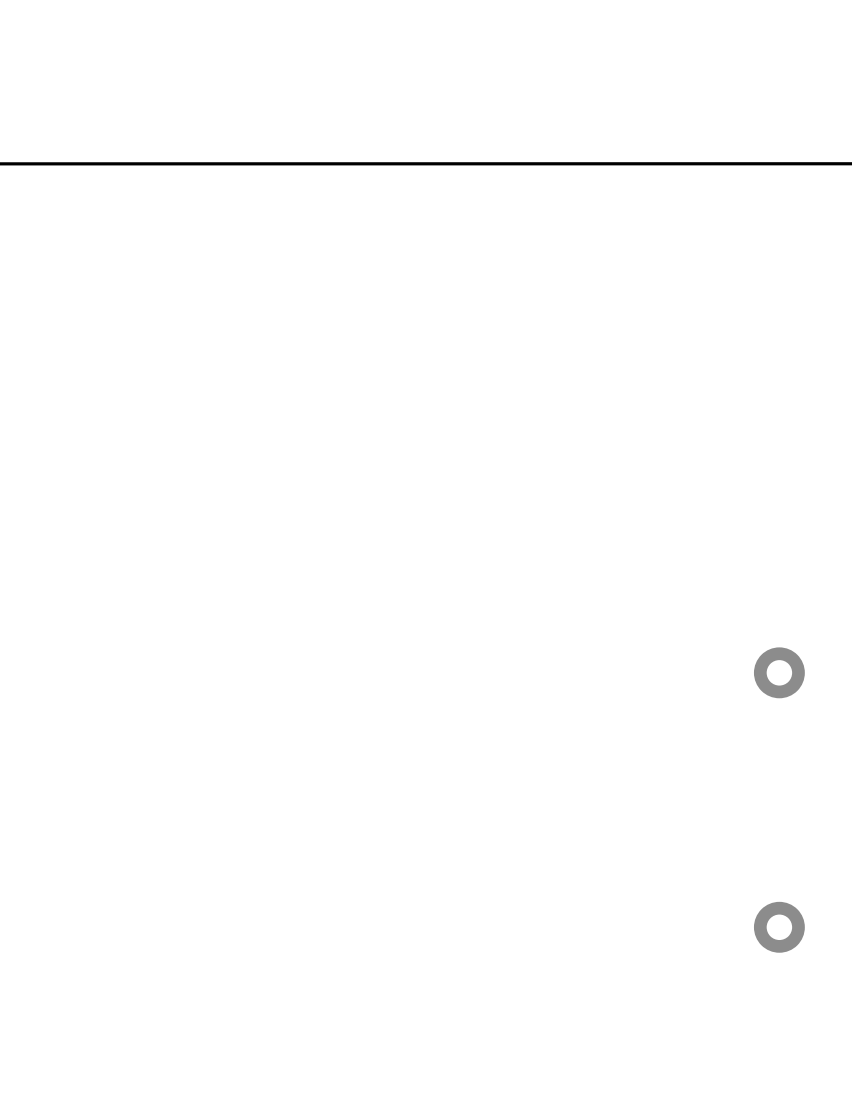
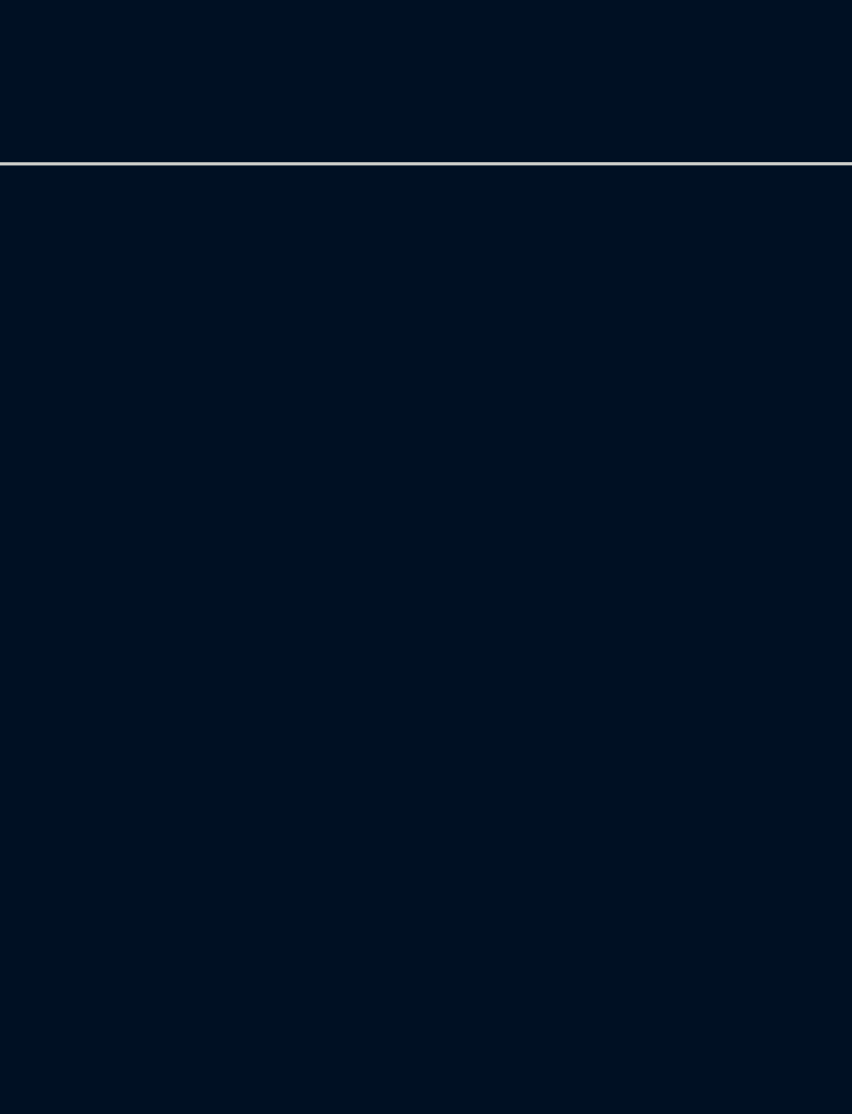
via: (779, 672) -> none
via: (779, 927) -> none

